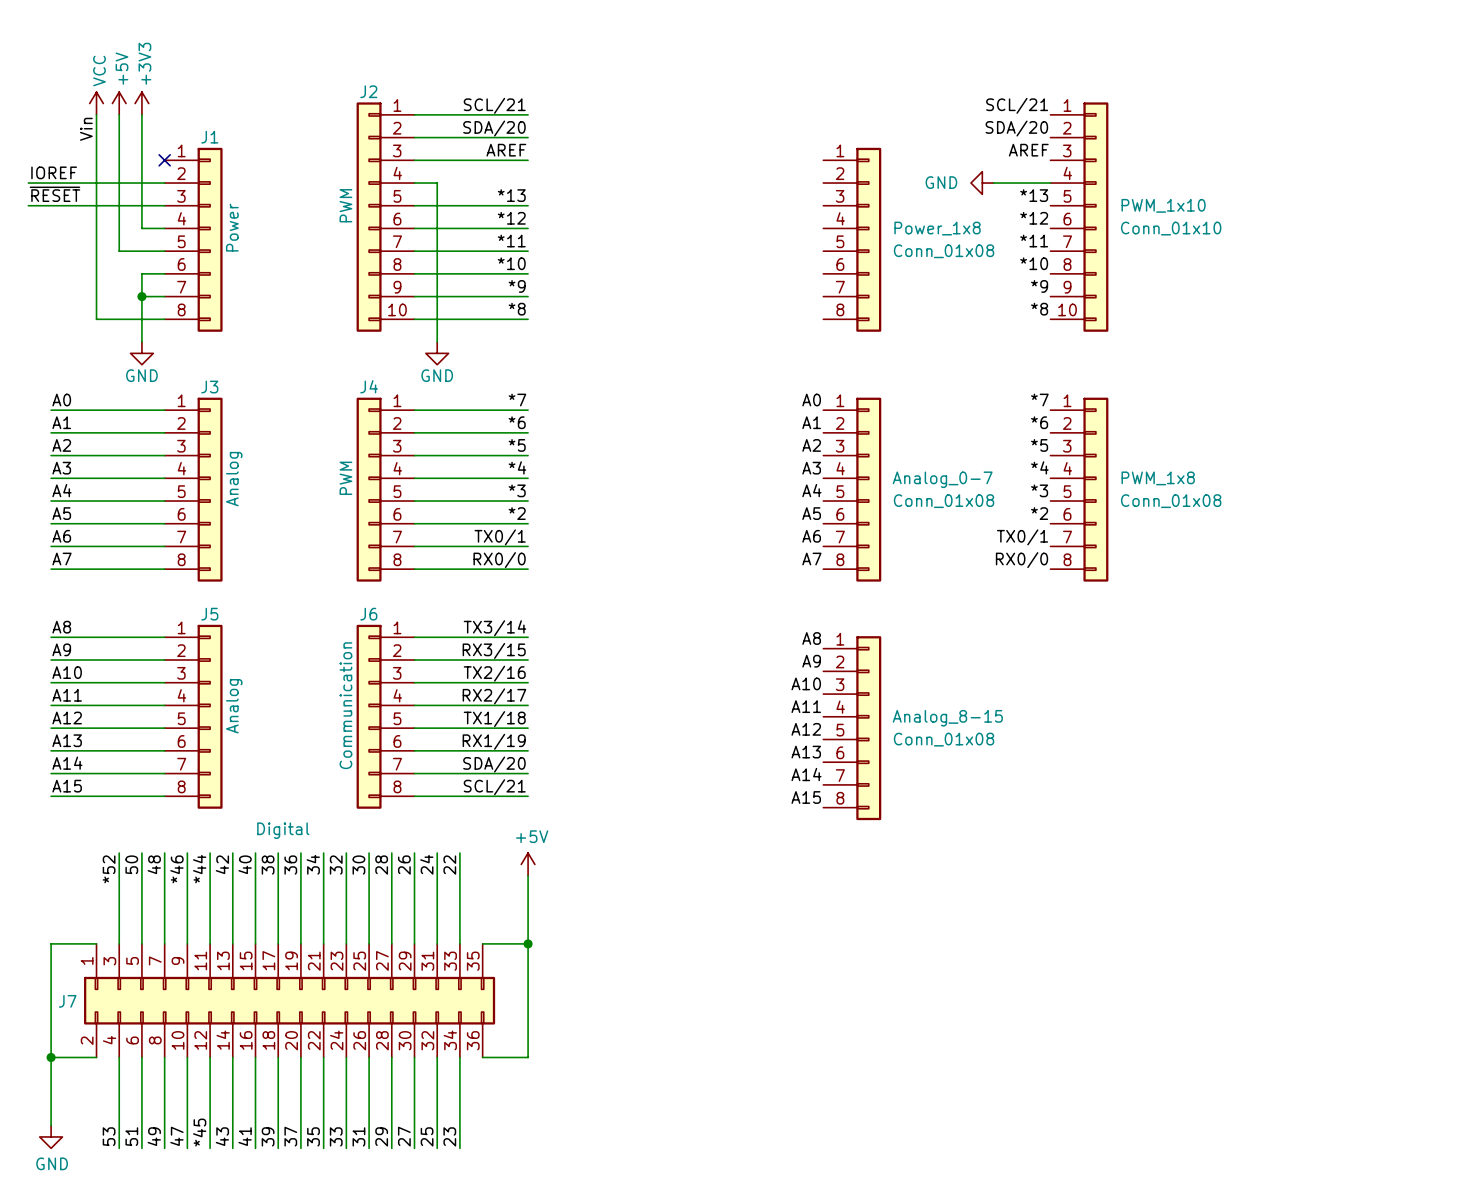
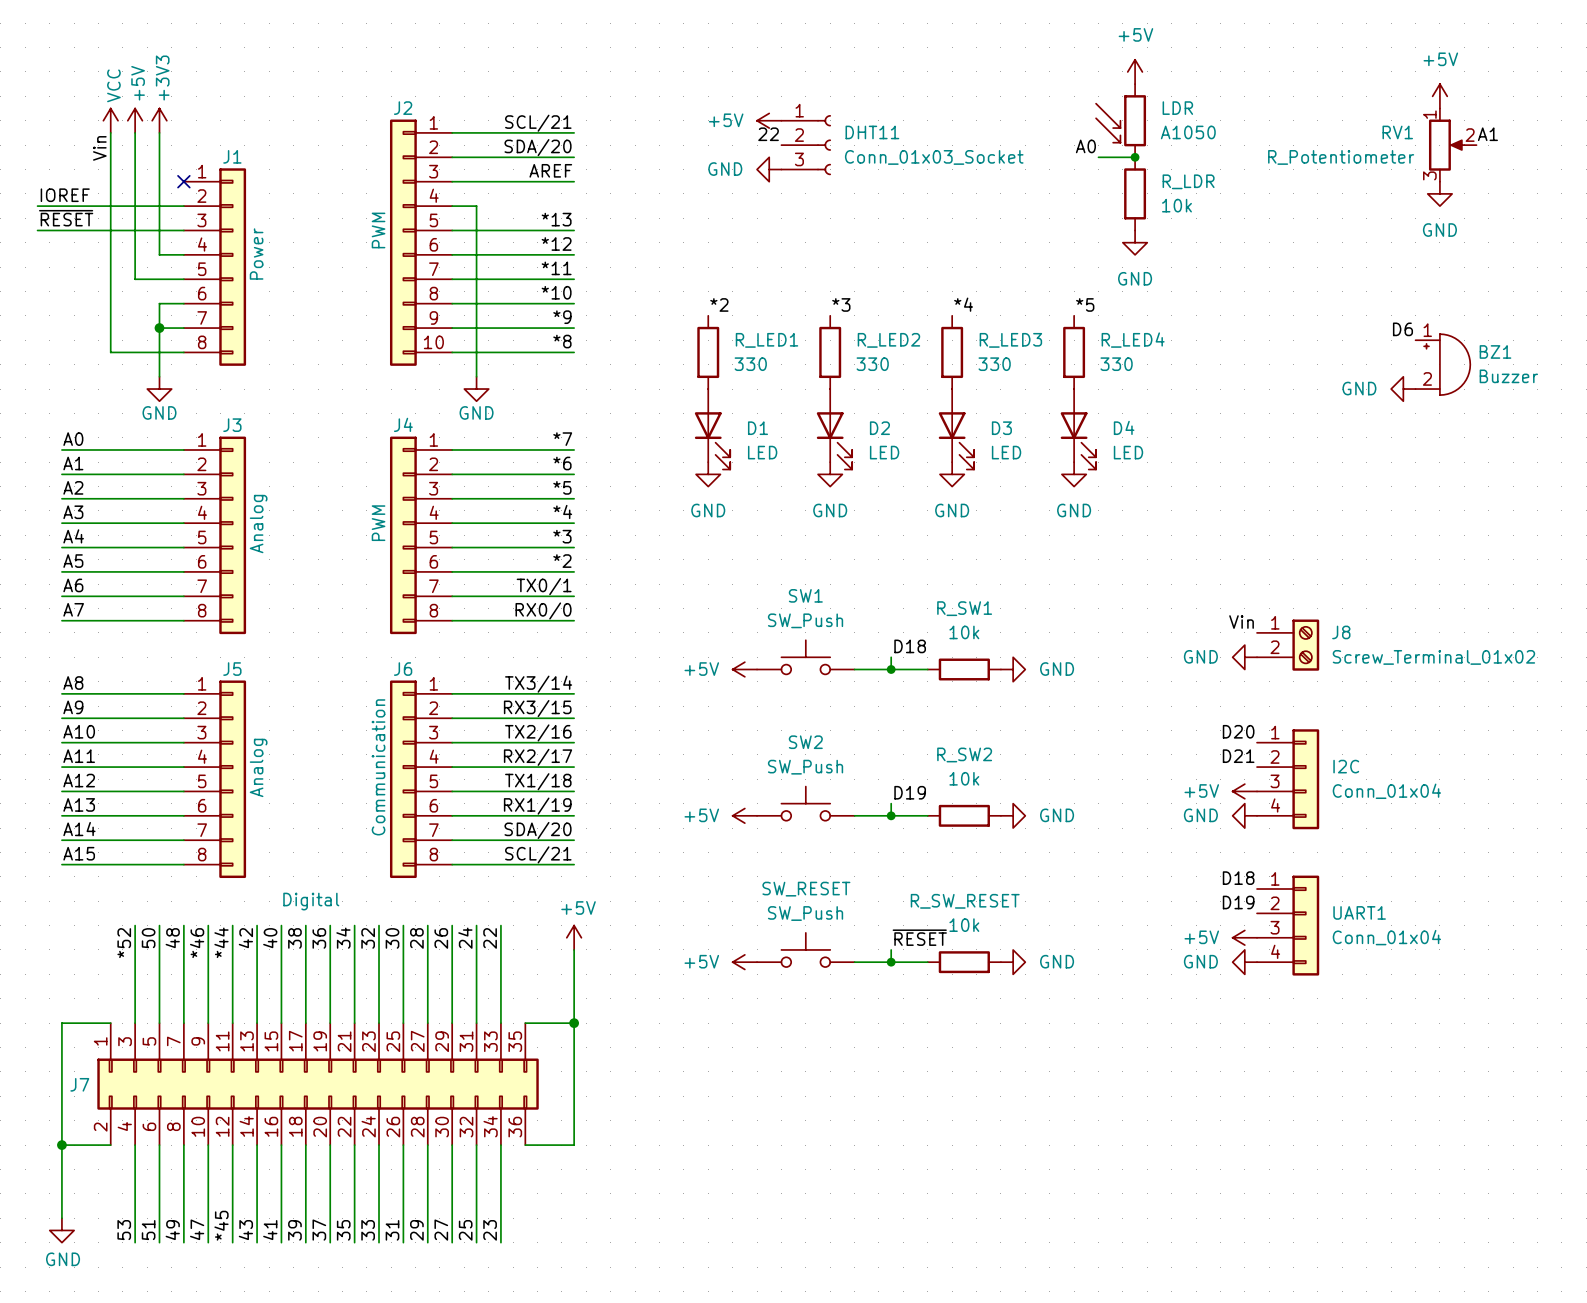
power symbol: none -> +5V (1135, 71)
power symbol: none -> +5V (1439, 96)
power symbol: none -> +5V (769, 120)
LDR: none -> A1050 (1121, 120)
label: SCL/21 (1017, 105) -> none
label: none -> 22 (768, 134)
label: none -> A1 (1487, 134)
DHT11: none -> Conn_01x03_Socket (806, 145)
RV1: none -> R_Potentiometer (1452, 145)
label: none -> A0 (1085, 146)
label: SDA/20 (1016, 128) -> none
wire: none -> (1098, 157) (1135, 157)
junction: none -> (1135, 157)
power symbol: none -> GND (769, 169)
label: AREF (1028, 150) -> none
R_LDR: none -> 10k (1135, 193)
power symbol: none -> GND (1439, 193)
power symbol rotation: 0° (982, 183) -> 90° counterclockwise (1135, 242)
power symbol position: GND (982, 183) -> GND (1135, 242)
wire: (993, 183) (1050, 183) -> none
label: *13 (1034, 195) -> none
PWM_1x10: Conn_01x10 (1079, 217) -> none
label: *12 (1034, 218) -> none
Power_1x8: Conn_01x08 (852, 239) -> none
label: *11 (1034, 241) -> none
label: *10 (1034, 263) -> none
label: none -> *4 (963, 304)
label: none -> *2 (719, 304)
label: none -> *3 (841, 304)
label: *9 (1039, 286) -> none
label: none -> D6 (1402, 329)
label: *8 (1039, 309) -> none
R_LED1: none -> 330 (708, 352)
R_LED2: none -> 330 (830, 352)
R_LED3: none -> 330 (952, 352)
R_LED4: none -> 330 (1074, 352)
BZ1: none -> Buzzer (1442, 364)
power symbol: none -> GND (1403, 389)
D1: none -> LED (712, 429)
D2: none -> LED (834, 429)
D3: none -> LED (956, 429)
D4: none -> LED (1078, 429)
label: A0 (811, 400) -> none
label: *7 (1039, 400) -> none
label: A1 (811, 422) -> none
label: *6 (1039, 422) -> none
power symbol: none -> GND (708, 474)
power symbol: none -> GND (830, 474)
power symbol: none -> GND (952, 474)
power symbol: none -> GND (1074, 474)
label: A2 (811, 445) -> none
label position: *5 (1039, 445) -> *5 (1085, 304)
label: *4 (1039, 467) -> none
label: A3 (811, 468) -> none
Analog_0-7: Conn_01x08 (852, 489) -> none
PWM_1x8: Conn_01x08 (1079, 489) -> none
label: A4 (811, 490) -> none
label: *3 (1039, 490) -> none
label: A5 (811, 513) -> none
label: *2 (1039, 513) -> none
label: A6 (811, 536) -> none
label: TX0/1 (1022, 537) -> none
label: A7 (811, 559) -> none
label: RX0/0 (1022, 560) -> none
label: none -> Vin (1241, 622)
J8: none -> Screw_Terminal_01x02 (1288, 645)
label: none -> D18 (910, 646)
SW1: none -> SW_Push (805, 657)
wire: none -> (891, 657) (891, 669)
power symbol: none -> GND (1244, 657)
power symbol: none -> +5V (744, 669)
wire: none -> (854, 669) (927, 669)
junction: none -> (891, 669)
R_SW1: none -> 10k (964, 669)
power symbol: none -> GND (1013, 669)
label: A8 (811, 638) -> none
label: A9 (811, 661) -> none
label: none -> D20 (1238, 731)
label: A10 (806, 683) -> none
label: none -> D21 (1238, 756)
label: A11 (806, 706) -> none
I2C: none -> Conn_01x04 (1288, 779)
Analog_8-15: Conn_01x08 (852, 728) -> none
power symbol: none -> +5V (1244, 791)
label: A12 (806, 729) -> D19 (910, 792)
SW2: none -> SW_Push (805, 803)
wire: none -> (891, 803) (891, 815)
power symbol: none -> +5V (744, 815)
wire: none -> (854, 815) (927, 815)
junction: none -> (891, 815)
R_SW2: none -> 10k (964, 815)
power symbol: none -> GND (1013, 815)
power symbol: none -> GND (1244, 815)
label: A13 (806, 752) -> none
label: A14 (806, 774) -> none
label: A15 (806, 797) -> none
label: none -> D18 (1238, 878)
label: none -> D19 (1238, 902)
UART1: none -> Conn_01x04 (1288, 925)
label: none -> ~{RESET} (919, 937)
power symbol: none -> +5V (1244, 937)
SW_RESET: none -> SW_Push (805, 949)
wire: none -> (891, 949) (891, 962)
power symbol: none -> +5V (744, 962)
wire: none -> (854, 962) (927, 962)
junction: none -> (891, 962)
R_SW_RESET: none -> 10k (964, 962)
power symbol: none -> GND (1013, 962)
power symbol: none -> GND (1244, 962)

